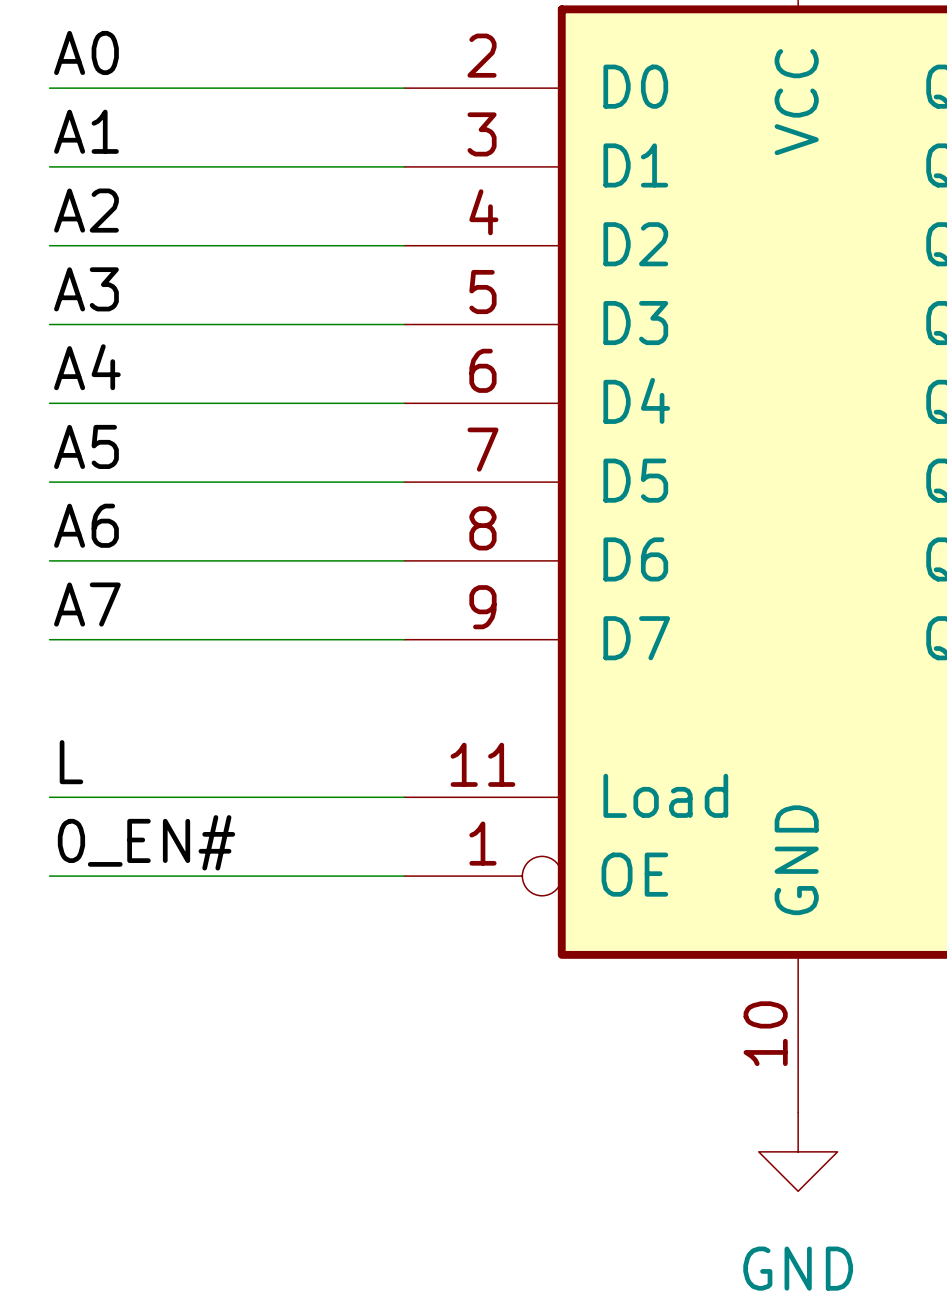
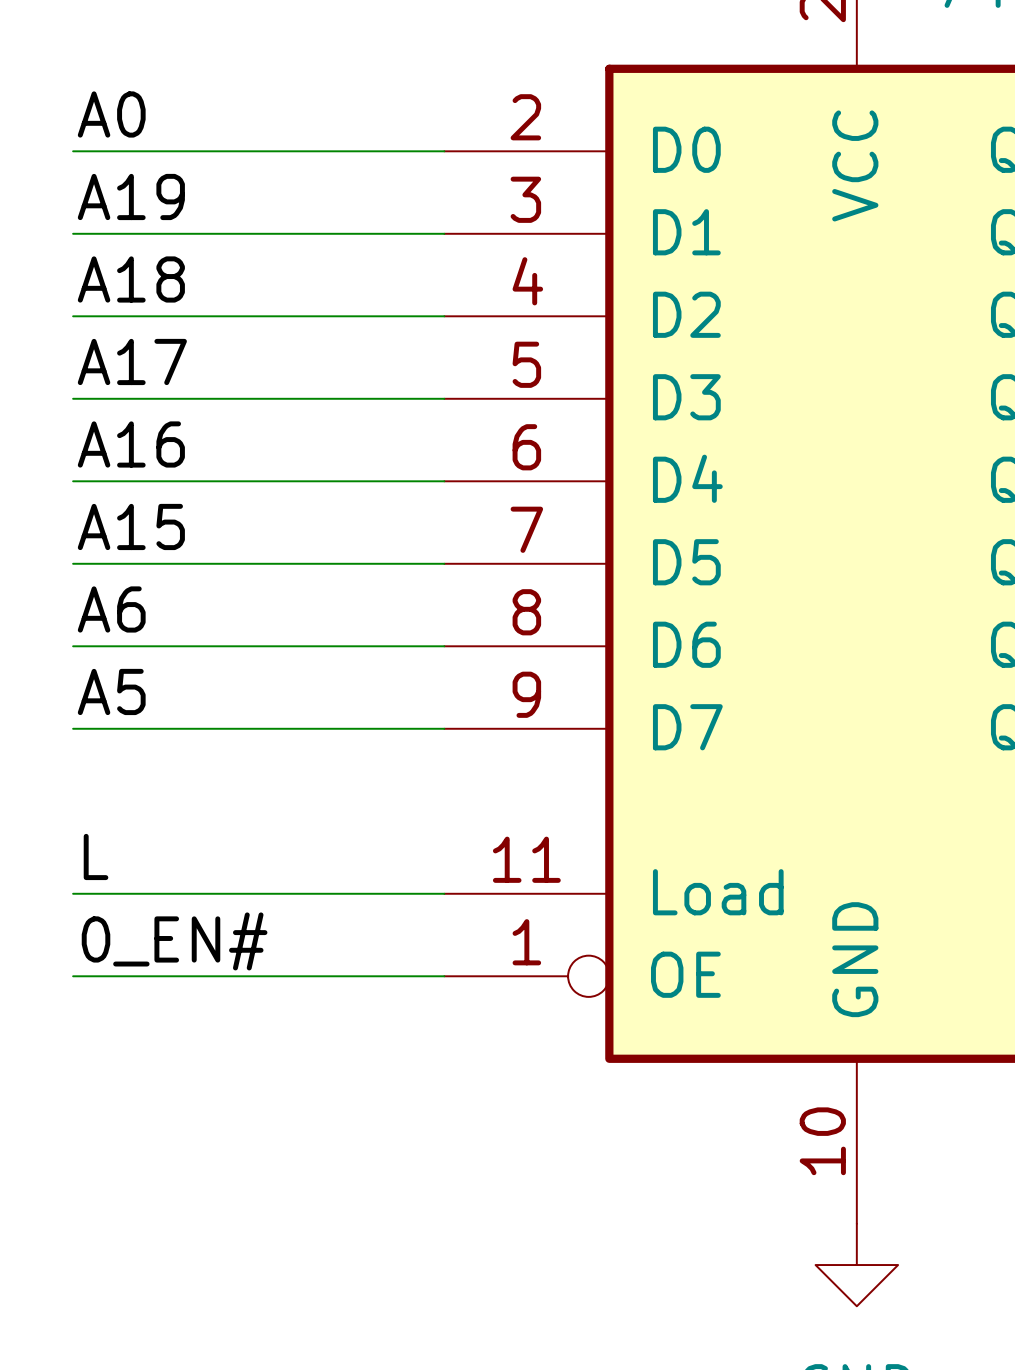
label: A1 (86, 131) -> A19 (131, 196)
label: A2 (86, 210) -> A18 (131, 279)
label: A3 (86, 289) -> A17 (132, 361)
label: A4 (87, 367) -> A16 (131, 444)
label: A5 (86, 446) -> A15 (131, 526)
label: A7 (87, 604) -> A5 (111, 691)

